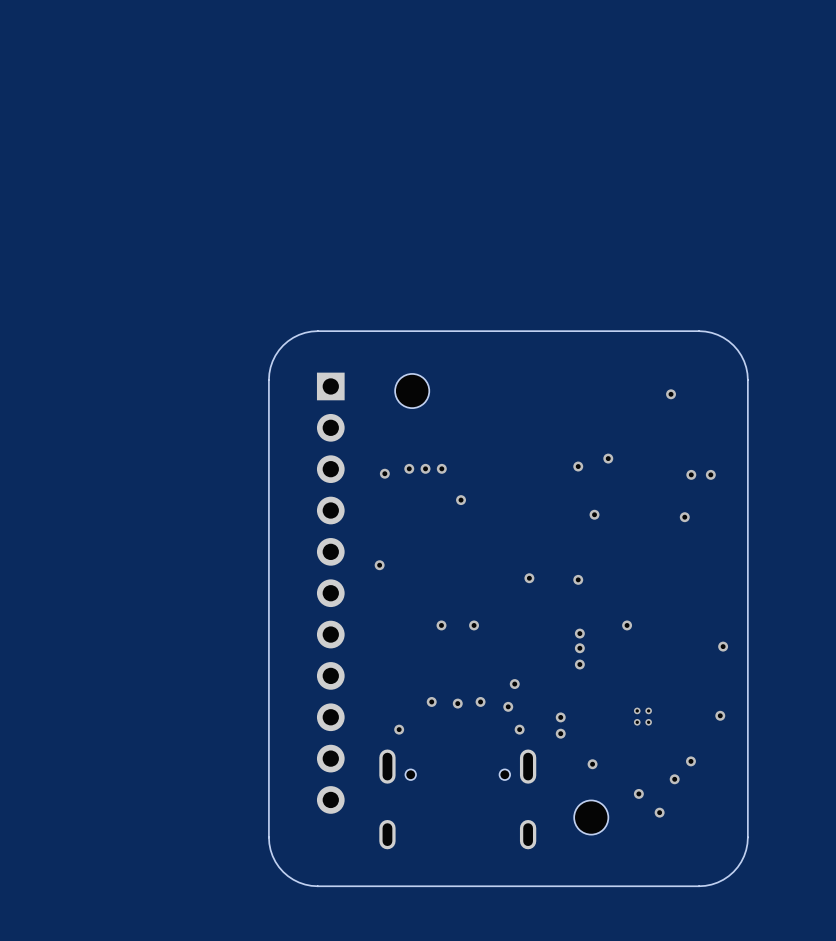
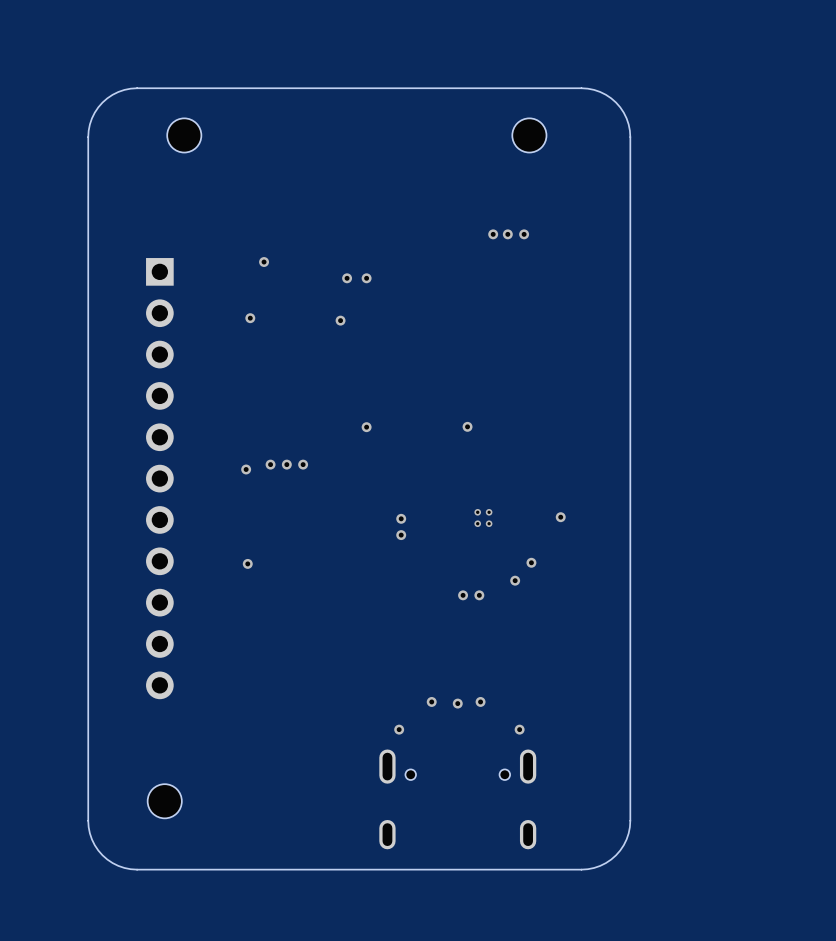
board edge: none -> (581, 88) (137, 88) (124, 89) (112, 94) (102, 102) (94, 112) (89, 124) (88, 137) (88, 820) (89, 833) (94, 845) (102, 855) (112, 863) (124, 867) (137, 869) (581, 869) (594, 867) (605, 863) (616, 855) (623, 845) (628, 833) (630, 820) (630, 137) (626, 118) (616, 102) (600, 91) (581, 88)
part: none -> (184, 135)
part: none -> (529, 135)
via: none -> (493, 234)
via: none -> (507, 234)
via: none -> (524, 234)
via: none -> (264, 262)
via: none -> (347, 278)
via: none -> (366, 278)
via: none -> (250, 318)
via: none -> (340, 320)
board edge: (699, 331) (317, 331) (305, 332) (293, 337) (279, 350) (272, 361) (268, 379) (268, 837) (270, 850) (275, 861) (288, 876) (299, 882) (317, 886) (699, 886) (711, 884) (723, 879) (737, 867) (746, 850) (747, 837) (747, 373) (744, 361) (733, 345) (717, 334) (699, 331) -> none
part: (412, 391) -> none
via: (671, 394) -> none
via: none -> (467, 426)
via: none -> (366, 427)
via: (608, 458) -> none
via: none -> (270, 464)
via: none -> (286, 464)
via: none -> (303, 464)
via: (578, 466) -> none
via: (409, 468) -> none
via: (425, 468) -> none
via: (441, 468) -> none
via: none -> (246, 469)
via: (384, 473) -> none
via: (691, 474) -> none
via: (710, 474) -> none
via: (461, 500) -> none
via: none -> (477, 512)
via: none -> (489, 512)
via: (594, 514) -> none
via: none -> (560, 517)
via: (684, 517) -> none
via: none -> (401, 518)
via: none -> (477, 523)
via: none -> (489, 523)
via: none -> (401, 535)
via: none -> (531, 562)
via: none -> (247, 563)
via: (379, 565) -> none
via: (529, 578) -> none
via: (578, 579) -> none
via: none -> (515, 580)
part position: (330, 593) -> (159, 478)
via: none -> (463, 595)
via: none -> (479, 595)
via: (441, 625) -> none
via: (474, 625) -> none
via: (627, 625) -> none
via: (579, 633) -> none
via: (723, 646) -> none
via: (579, 648) -> none
via: (579, 664) -> none
via: (514, 684) -> none
via: (508, 706) -> none
via: (637, 710) -> none
via: (648, 710) -> none
via: (720, 715) -> none
via: (560, 717) -> none
via: (637, 722) -> none
via: (648, 722) -> none
via: (560, 733) -> none
via: (690, 761) -> none
via: (592, 764) -> none
via: (674, 779) -> none
via: (638, 793) -> none
part: none -> (164, 801)
via: (659, 812) -> none
part: (591, 817) -> none

